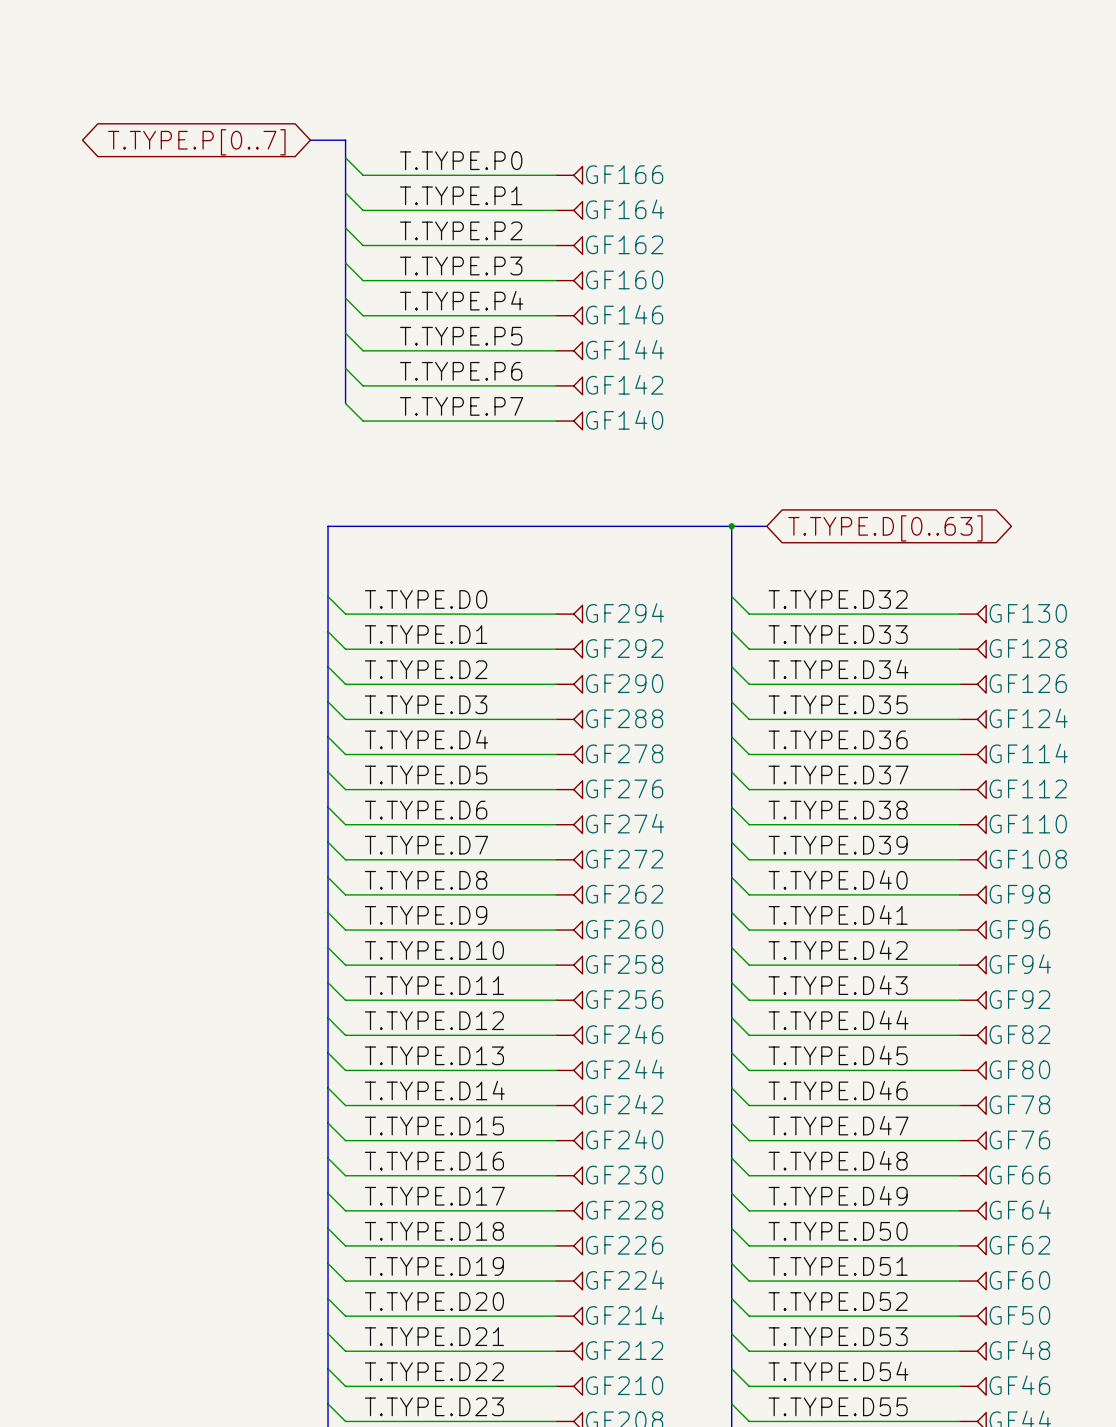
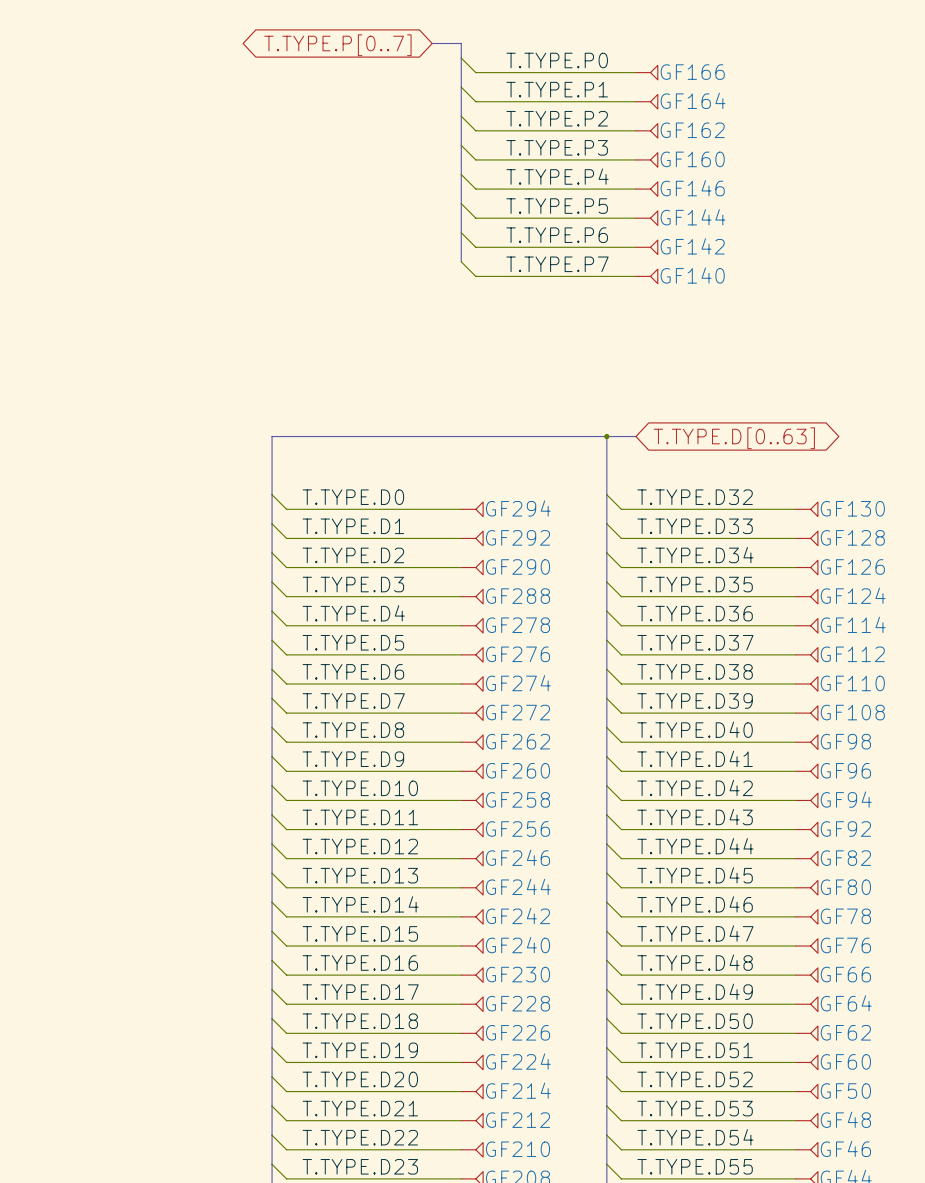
bus: none -> (432, 43) (461, 43) (461, 261)
global label: none -> T.TYPE.P[0..7] (337, 45)
wire: none -> (461, 58) (475, 72) (635, 72)
label: none -> T.TYPE.P0 (557, 60)
wire: none -> (461, 87) (475, 101) (635, 101)
label: none -> T.TYPE.P1 (557, 89)
bus: (310, 140) (345, 140) (345, 403) -> none
wire: none -> (461, 116) (475, 130) (635, 130)
global label: T.TYPE.P[0..7] (196, 142) -> none
label: none -> T.TYPE.P2 (557, 118)
wire: (345, 157) (363, 175) (556, 175) -> (635, 159) (475, 159) (461, 145)
label: T.TYPE.P0 (461, 160) -> none
GF166 position: (569, 175) -> (647, 72)
label: none -> T.TYPE.P3 (557, 147)
wire: (345, 192) (363, 210) (556, 210) -> (635, 189) (475, 189) (461, 174)
label: T.TYPE.P1 (461, 195) -> none
GF164 position: (569, 210) -> (647, 101)
label: none -> T.TYPE.P4 (557, 176)
wire: (345, 227) (363, 245) (556, 245) -> (635, 218) (475, 218) (461, 203)
label: T.TYPE.P2 (461, 230) -> none
GF162 position: (569, 245) -> (647, 130)
label: none -> T.TYPE.P5 (557, 206)
wire: (345, 263) (363, 280) (556, 280) -> (635, 247) (475, 247) (461, 232)
label: T.TYPE.P3 (461, 266) -> none
GF160 position: (569, 280) -> (647, 159)
label: none -> T.TYPE.P6 (557, 235)
wire: (345, 298) (363, 315) (556, 315) -> (635, 276) (475, 276) (461, 261)
label: T.TYPE.P4 (461, 300) -> none
GF146 position: (569, 315) -> (647, 189)
label: none -> T.TYPE.P7 (557, 264)
wire: (345, 333) (363, 350) (556, 350) -> none
label: T.TYPE.P5 (461, 336) -> none
GF144 position: (569, 350) -> (647, 218)
wire: (345, 368) (363, 385) (556, 385) -> none
label: T.TYPE.P6 (461, 371) -> none
GF142 position: (569, 385) -> (647, 247)
wire: (345, 403) (363, 421) (556, 421) -> none
label: T.TYPE.P7 (461, 406) -> none
GF140 position: (569, 421) -> (647, 276)

